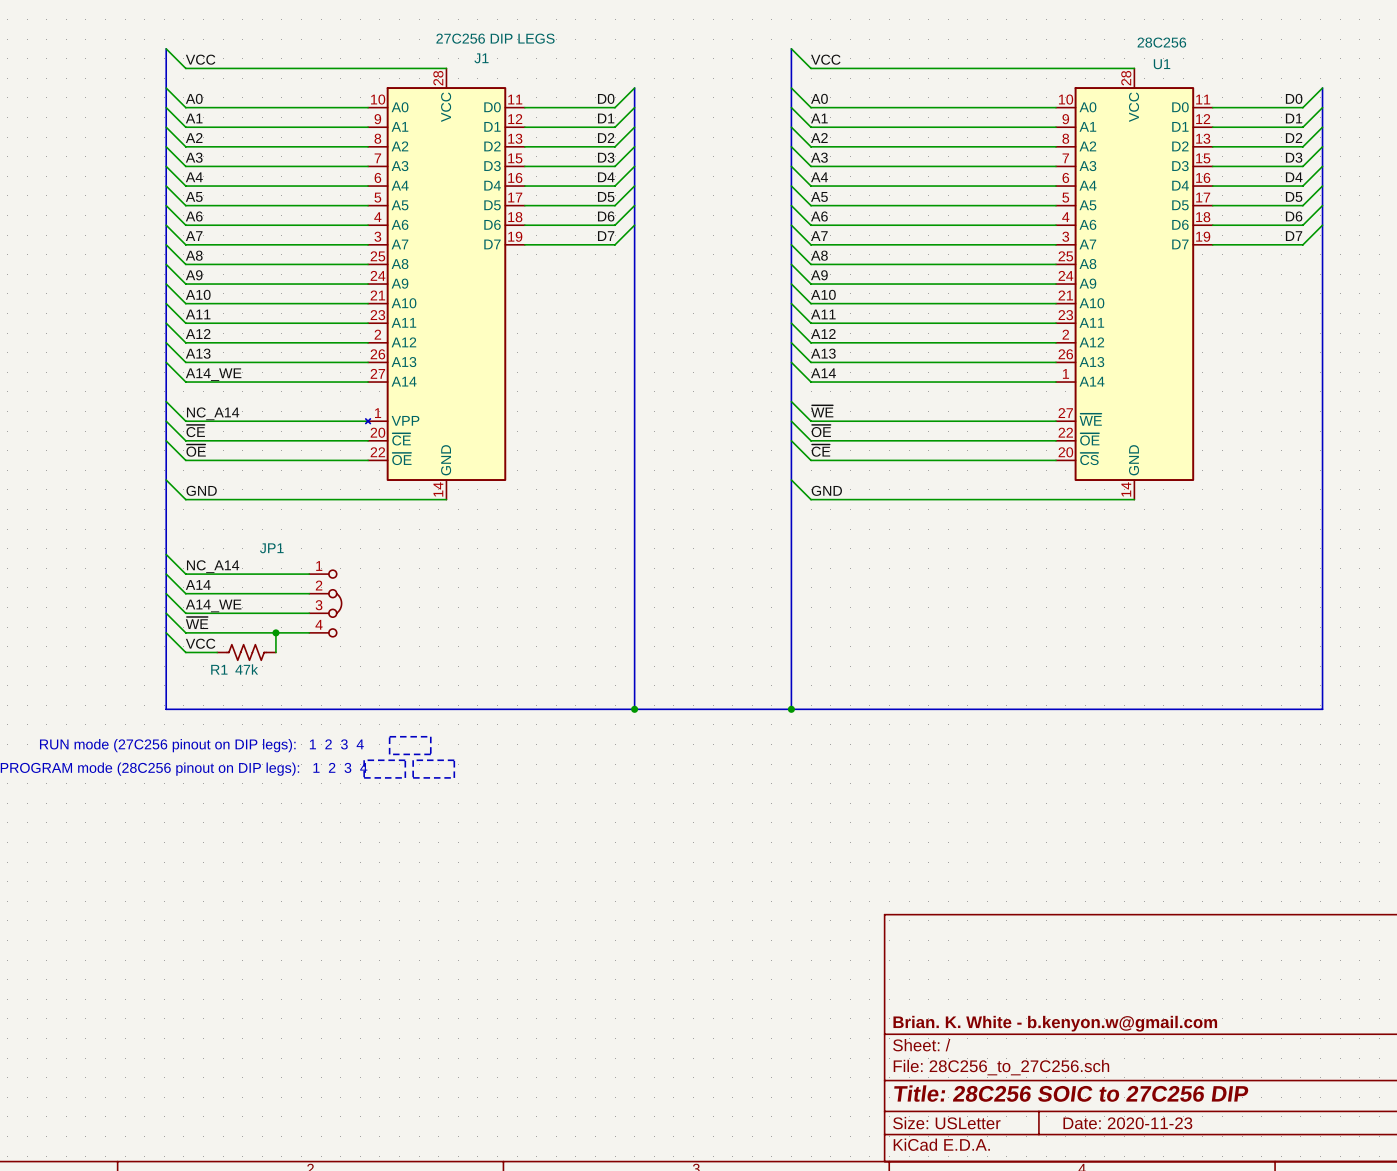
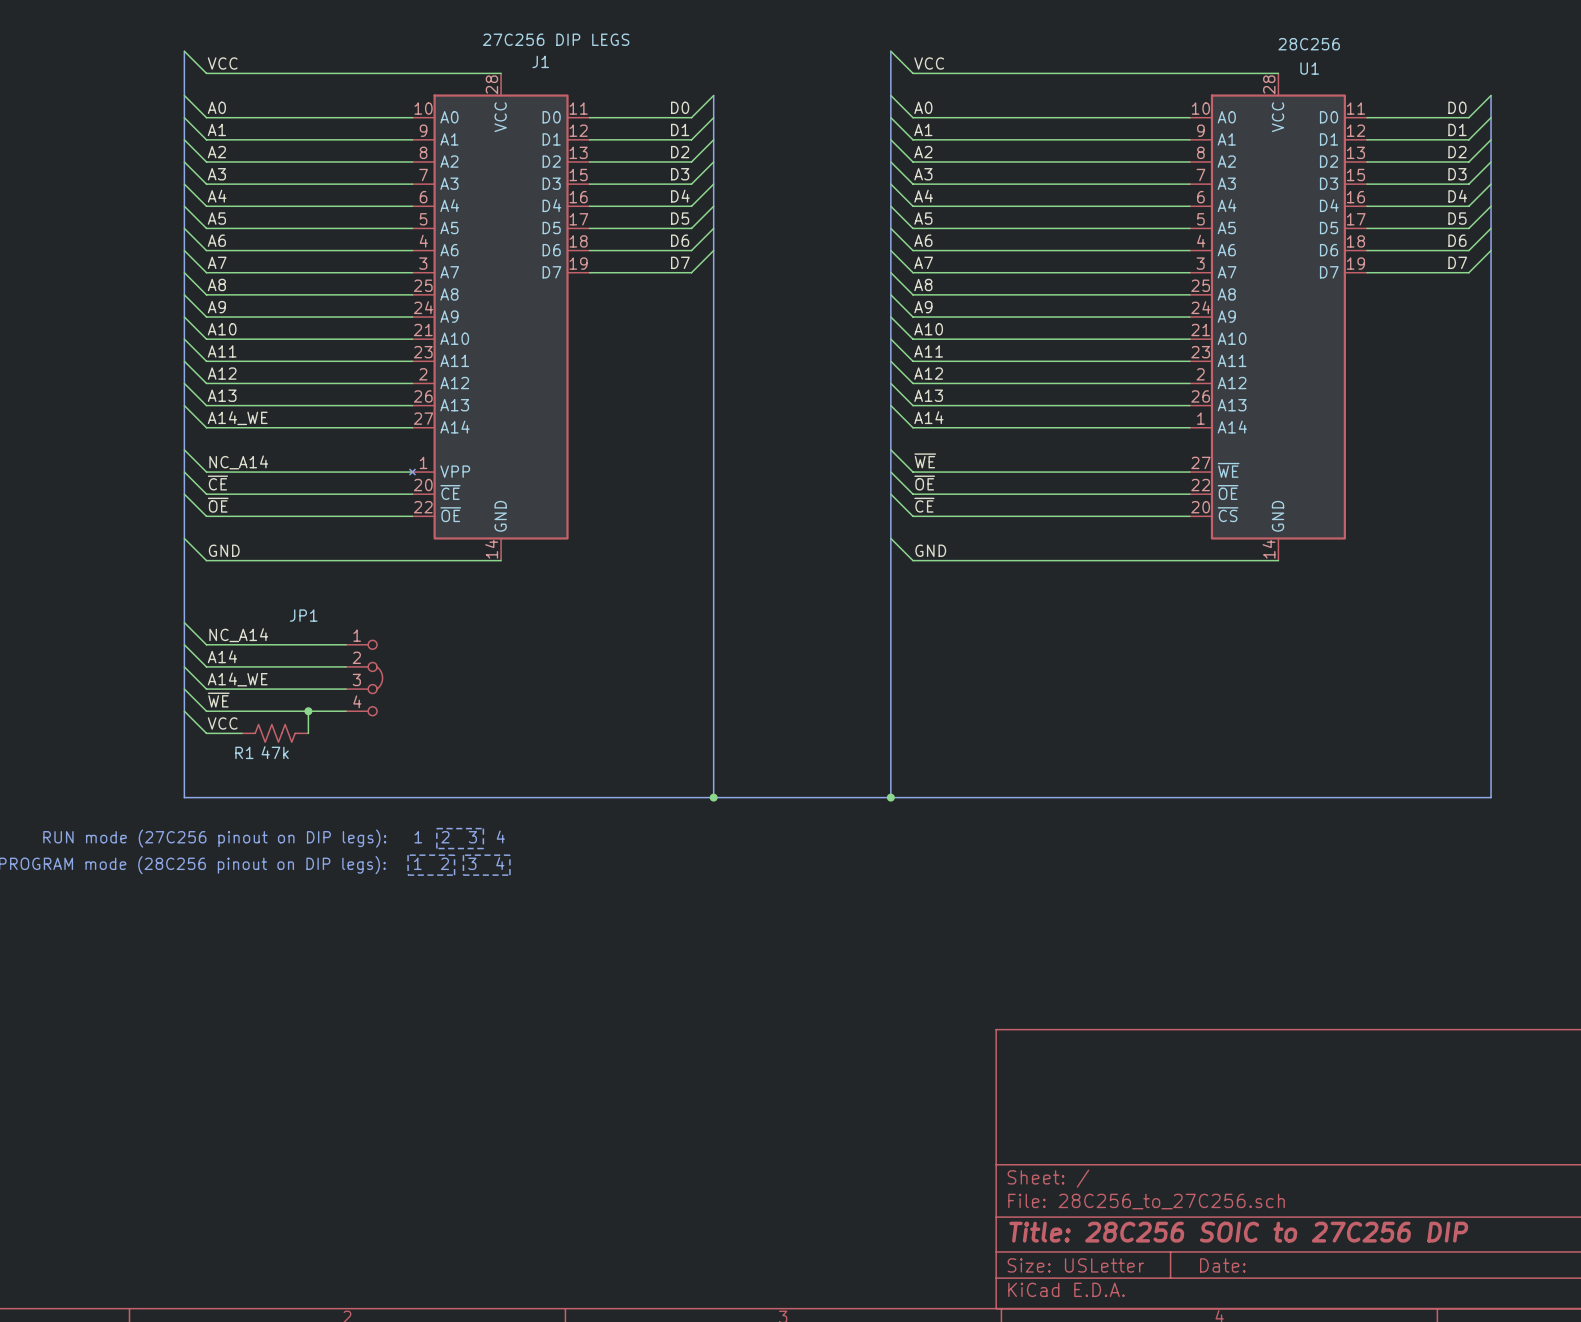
title block: Brian. K. White - b.kenyon.w@gmail.com (1055, 1023) -> none
title block: Date: 2020-11-23 (1127, 1123) -> Date: (1222, 1265)

